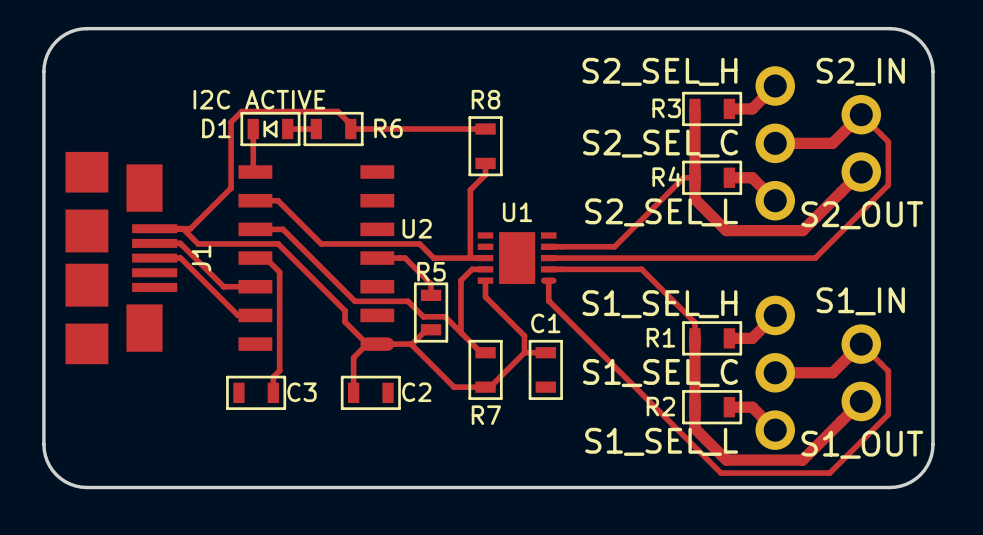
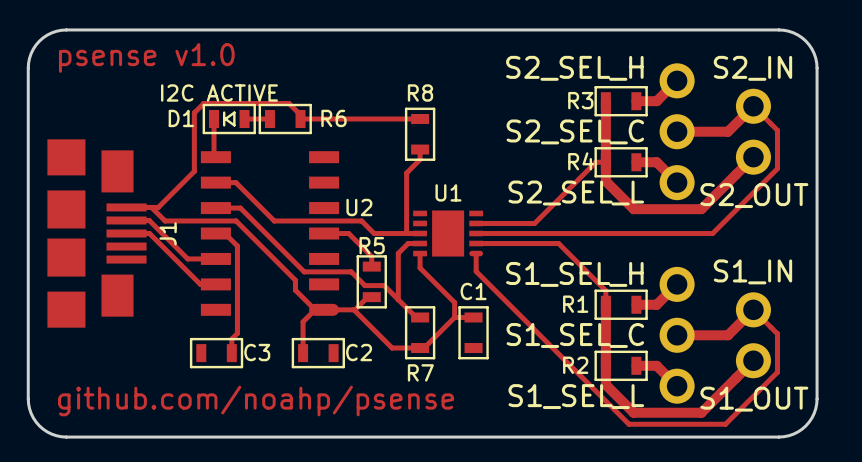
text: none -> psense v1.0 (146, 57)
text: none -> github.com/noahp/psense (256, 401)

